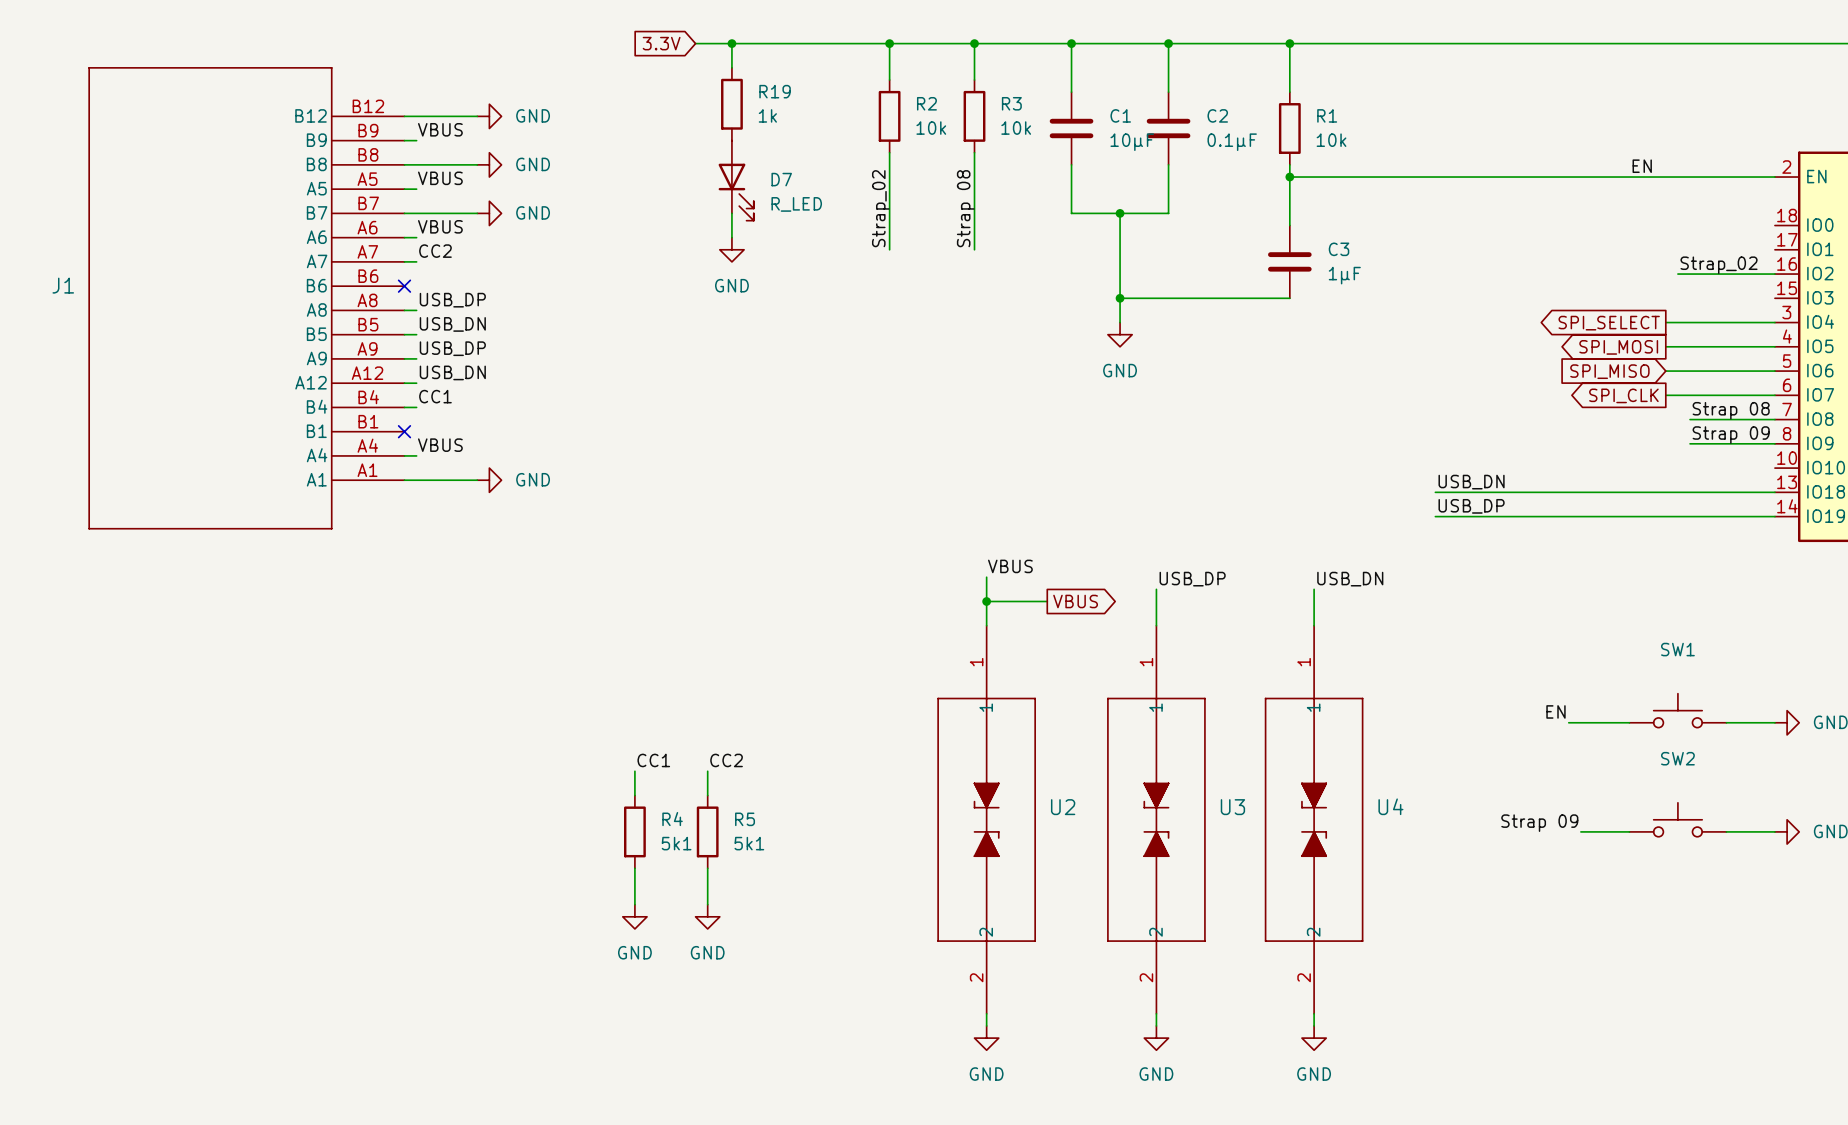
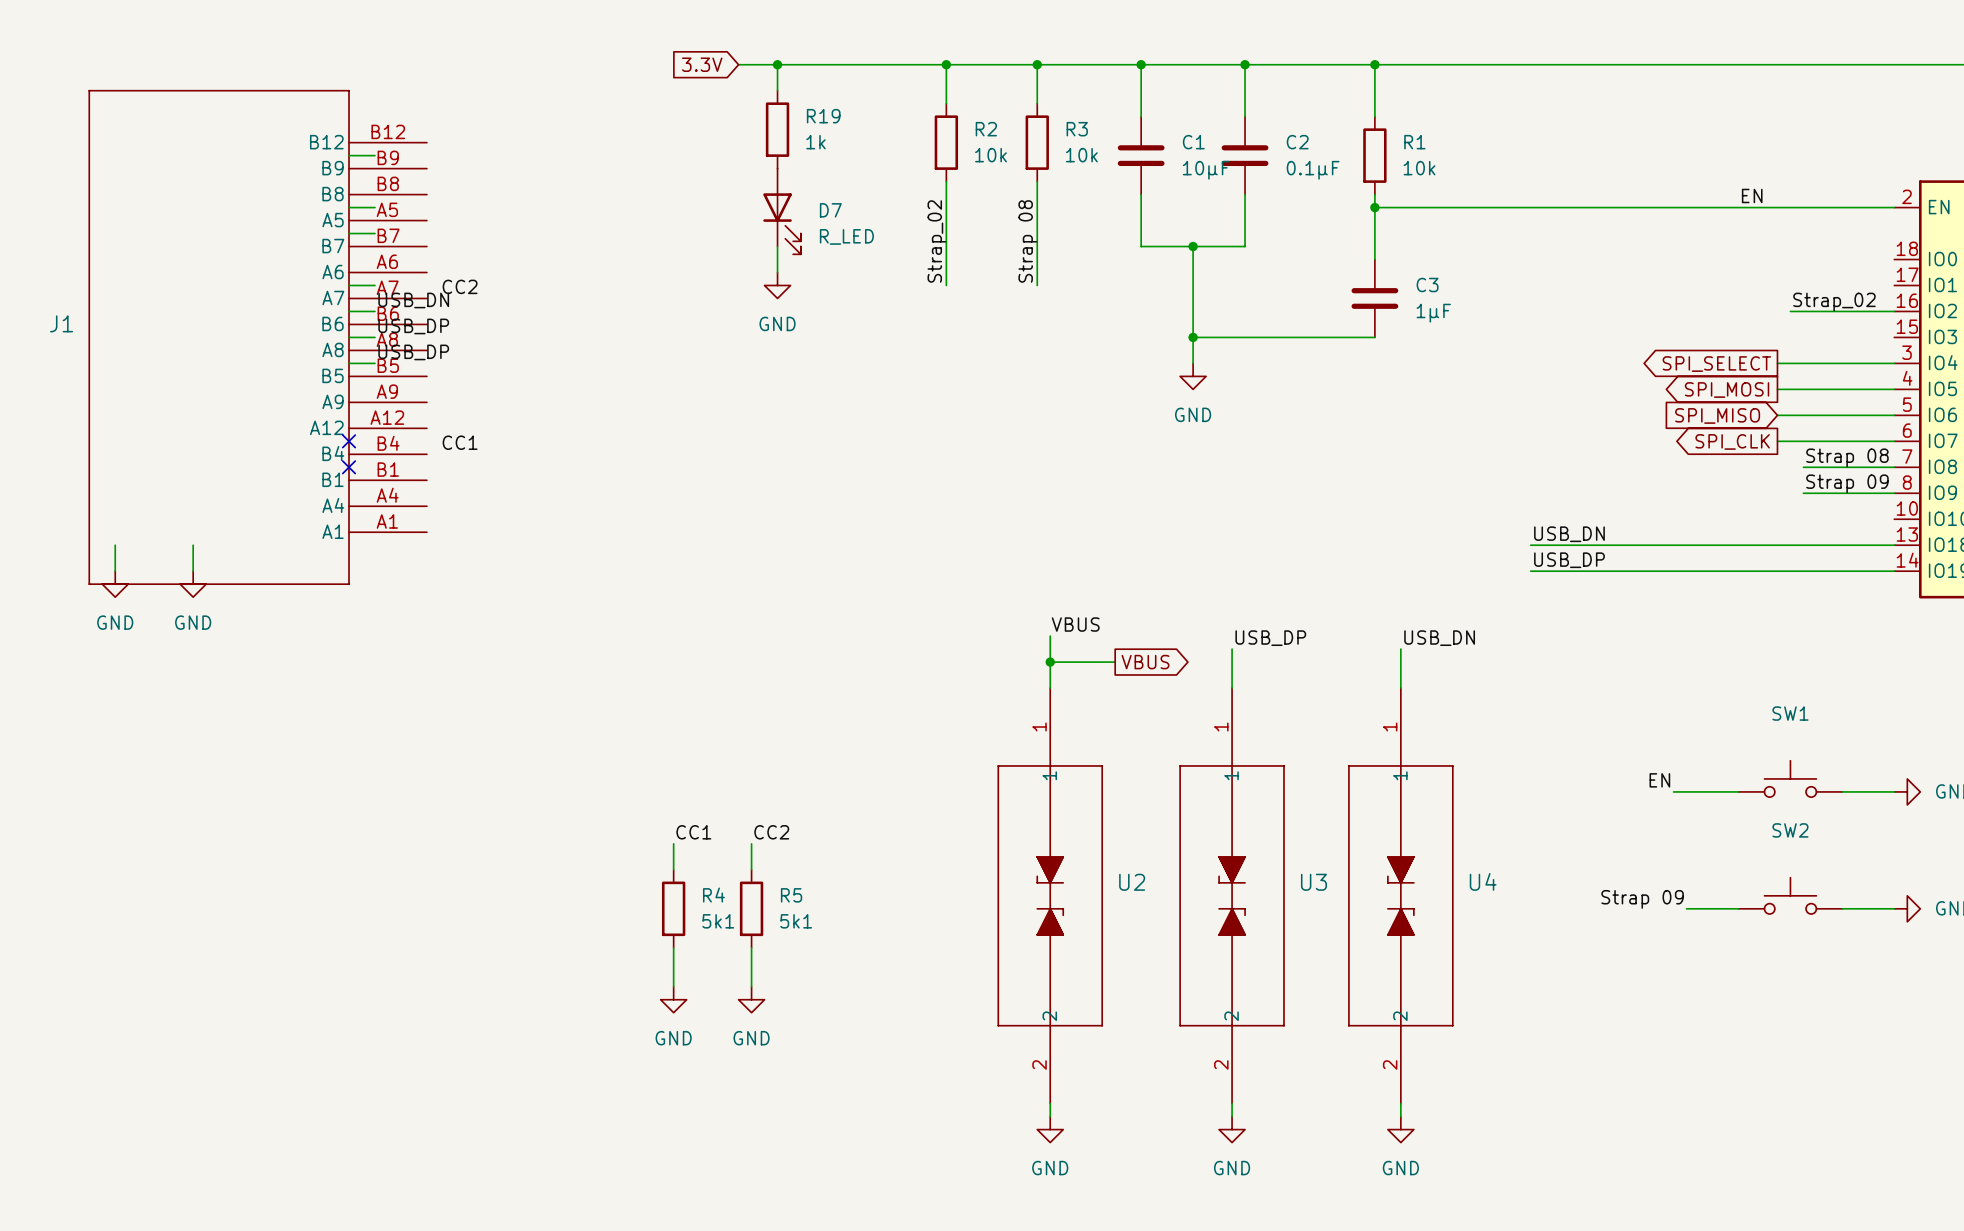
wire: (404, 116) (477, 116) -> none
power symbol: GND (489, 116) -> none
wire: none -> (348, 155) (374, 155)
label: VBUS (440, 129) -> none
wire: (404, 140) (416, 140) -> none
wire: (404, 164) (477, 164) -> none
power symbol: GND (489, 164) -> none
wire: none -> (348, 207) (374, 207)
label: VBUS (440, 178) -> none
wire: (404, 189) (416, 189) -> none
wire: none -> (348, 233) (374, 233)
wire: (404, 213) (477, 213) -> none
power symbol: GND (489, 213) -> none
label: VBUS (440, 226) -> none
wire: (404, 237) (416, 237) -> none
wire: none -> (348, 285) (374, 285)
wire: (404, 261) (416, 261) -> none
label: none -> USB_DN (413, 300)
wire: none -> (348, 311) (374, 311)
no-connect mark: (404, 286) -> none
label: none -> USB_DP (413, 326)
wire: none -> (348, 337) (374, 337)
label: USB_DP (452, 300) -> none
wire: (404, 310) (416, 310) -> none
label: none -> USB_DP (413, 352)
wire: none -> (348, 363) (374, 363)
label: USB_DN (452, 324) -> none
wire: (404, 334) (416, 334) -> none
label: USB_DP (452, 348) -> none
wire: (404, 358) (416, 358) -> none
label: USB_DN (452, 372) -> none
wire: (404, 383) (416, 383) -> none
no-connect mark: none -> (348, 441)
wire: (404, 407) (416, 407) -> none
no-connect mark: none -> (348, 467)
no-connect mark: (404, 431) -> none
label: VBUS (440, 445) -> none
wire: (404, 455) (416, 455) -> none
wire: (404, 480) (477, 480) -> none
power symbol: GND (489, 480) -> none
wire: none -> (115, 545) (115, 571)
wire: none -> (193, 545) (193, 571)
power symbol: none -> GND (115, 584)
power symbol: none -> GND (193, 584)

